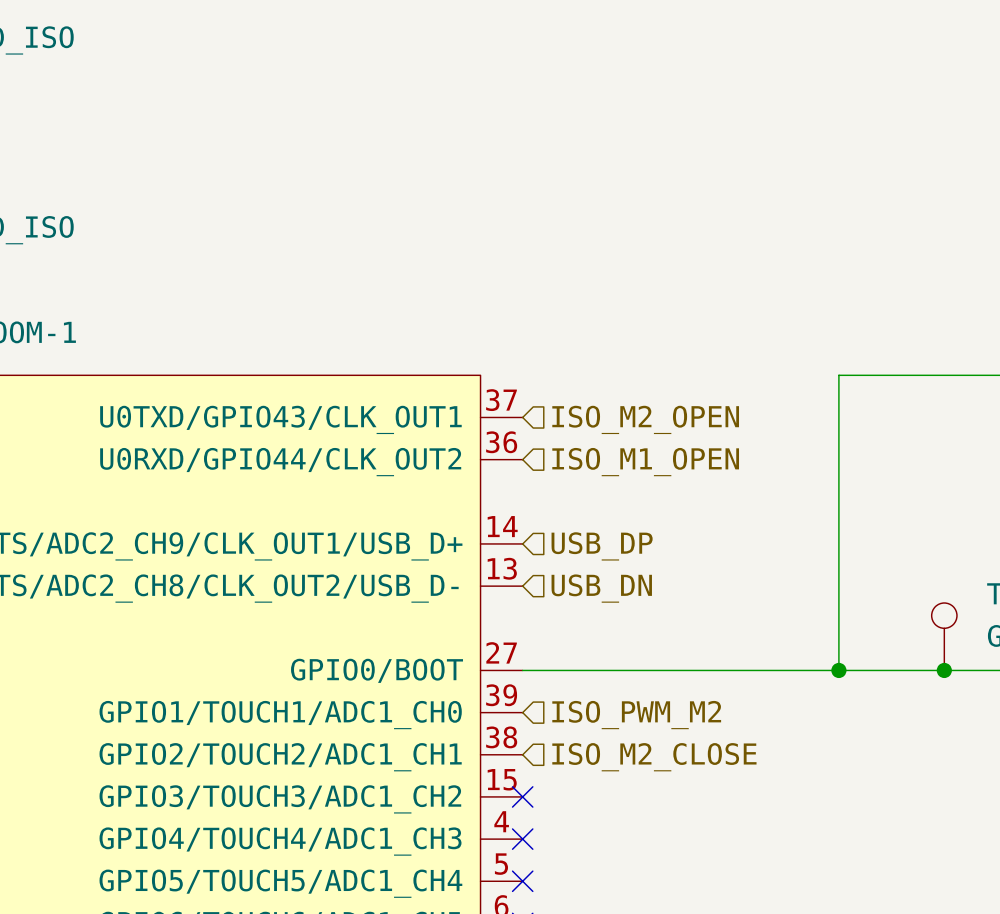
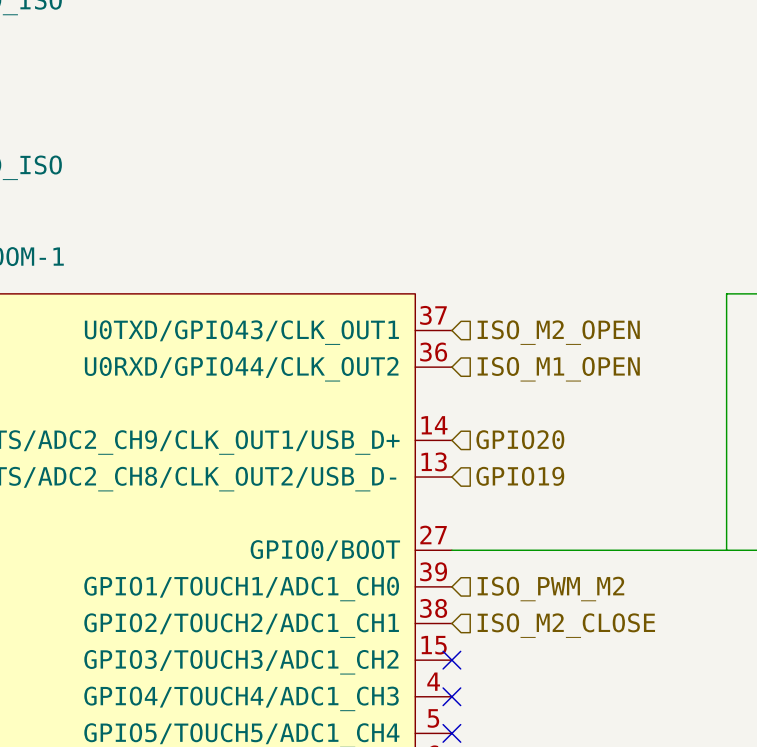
hierarchical label: USB_DP (602, 546) -> GPIO20 (520, 439)
hierarchical label: USB_DN (601, 588) -> GPIO19 (520, 476)
junction: (838, 670) -> none

